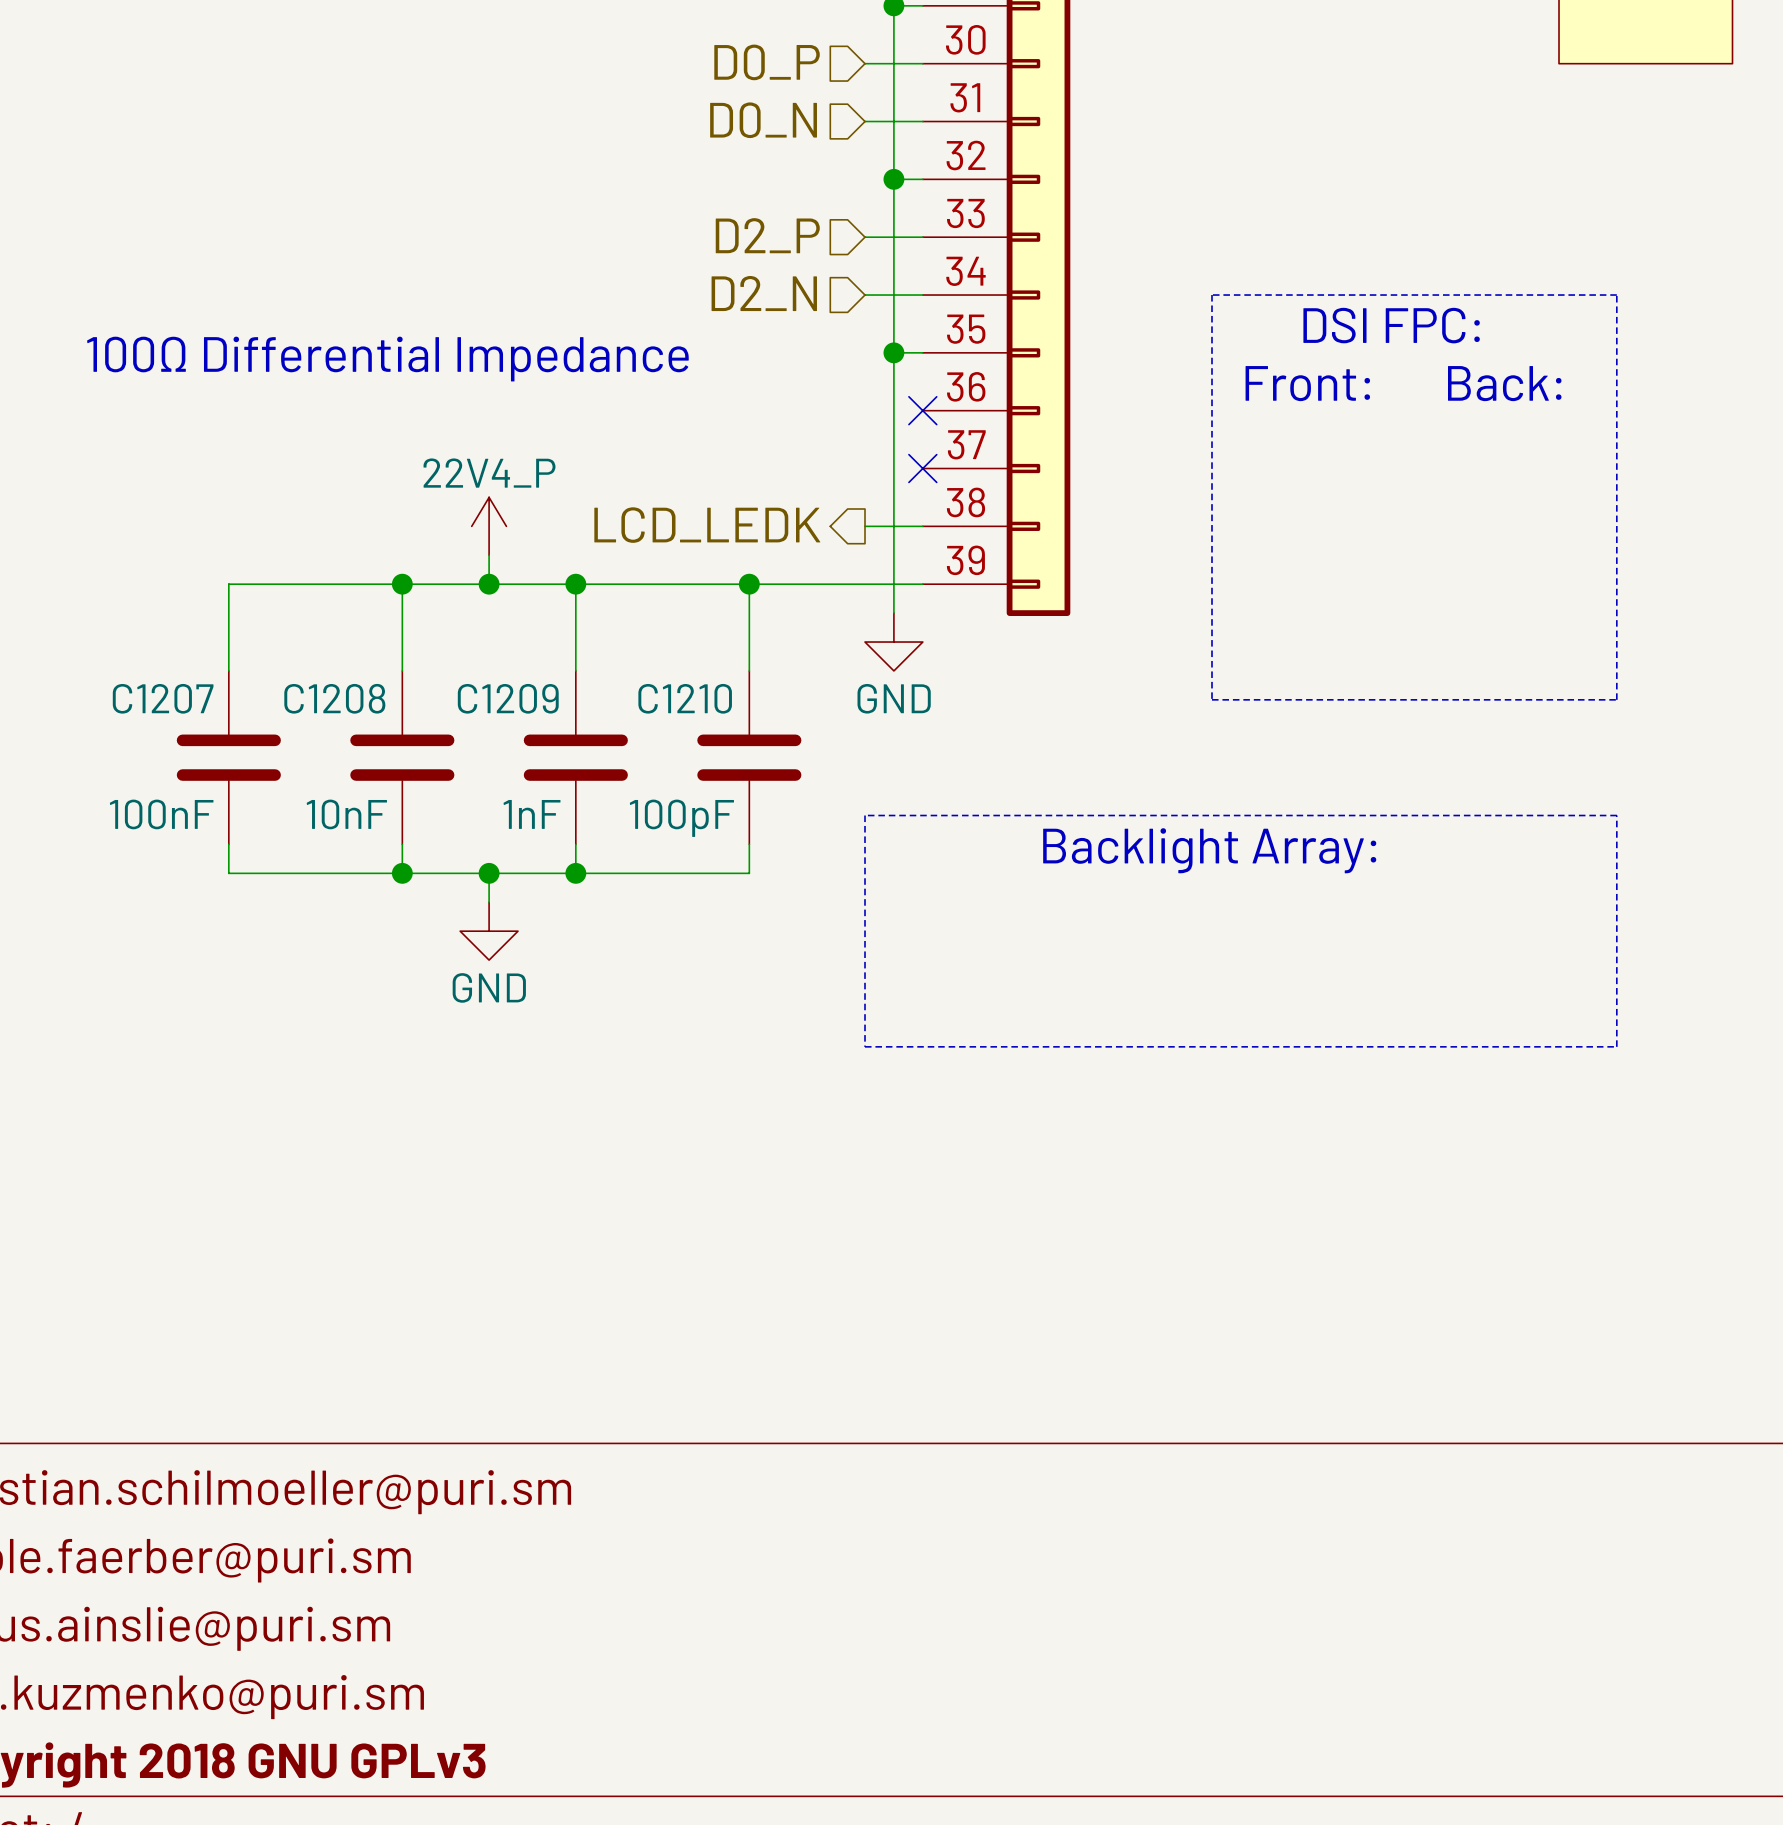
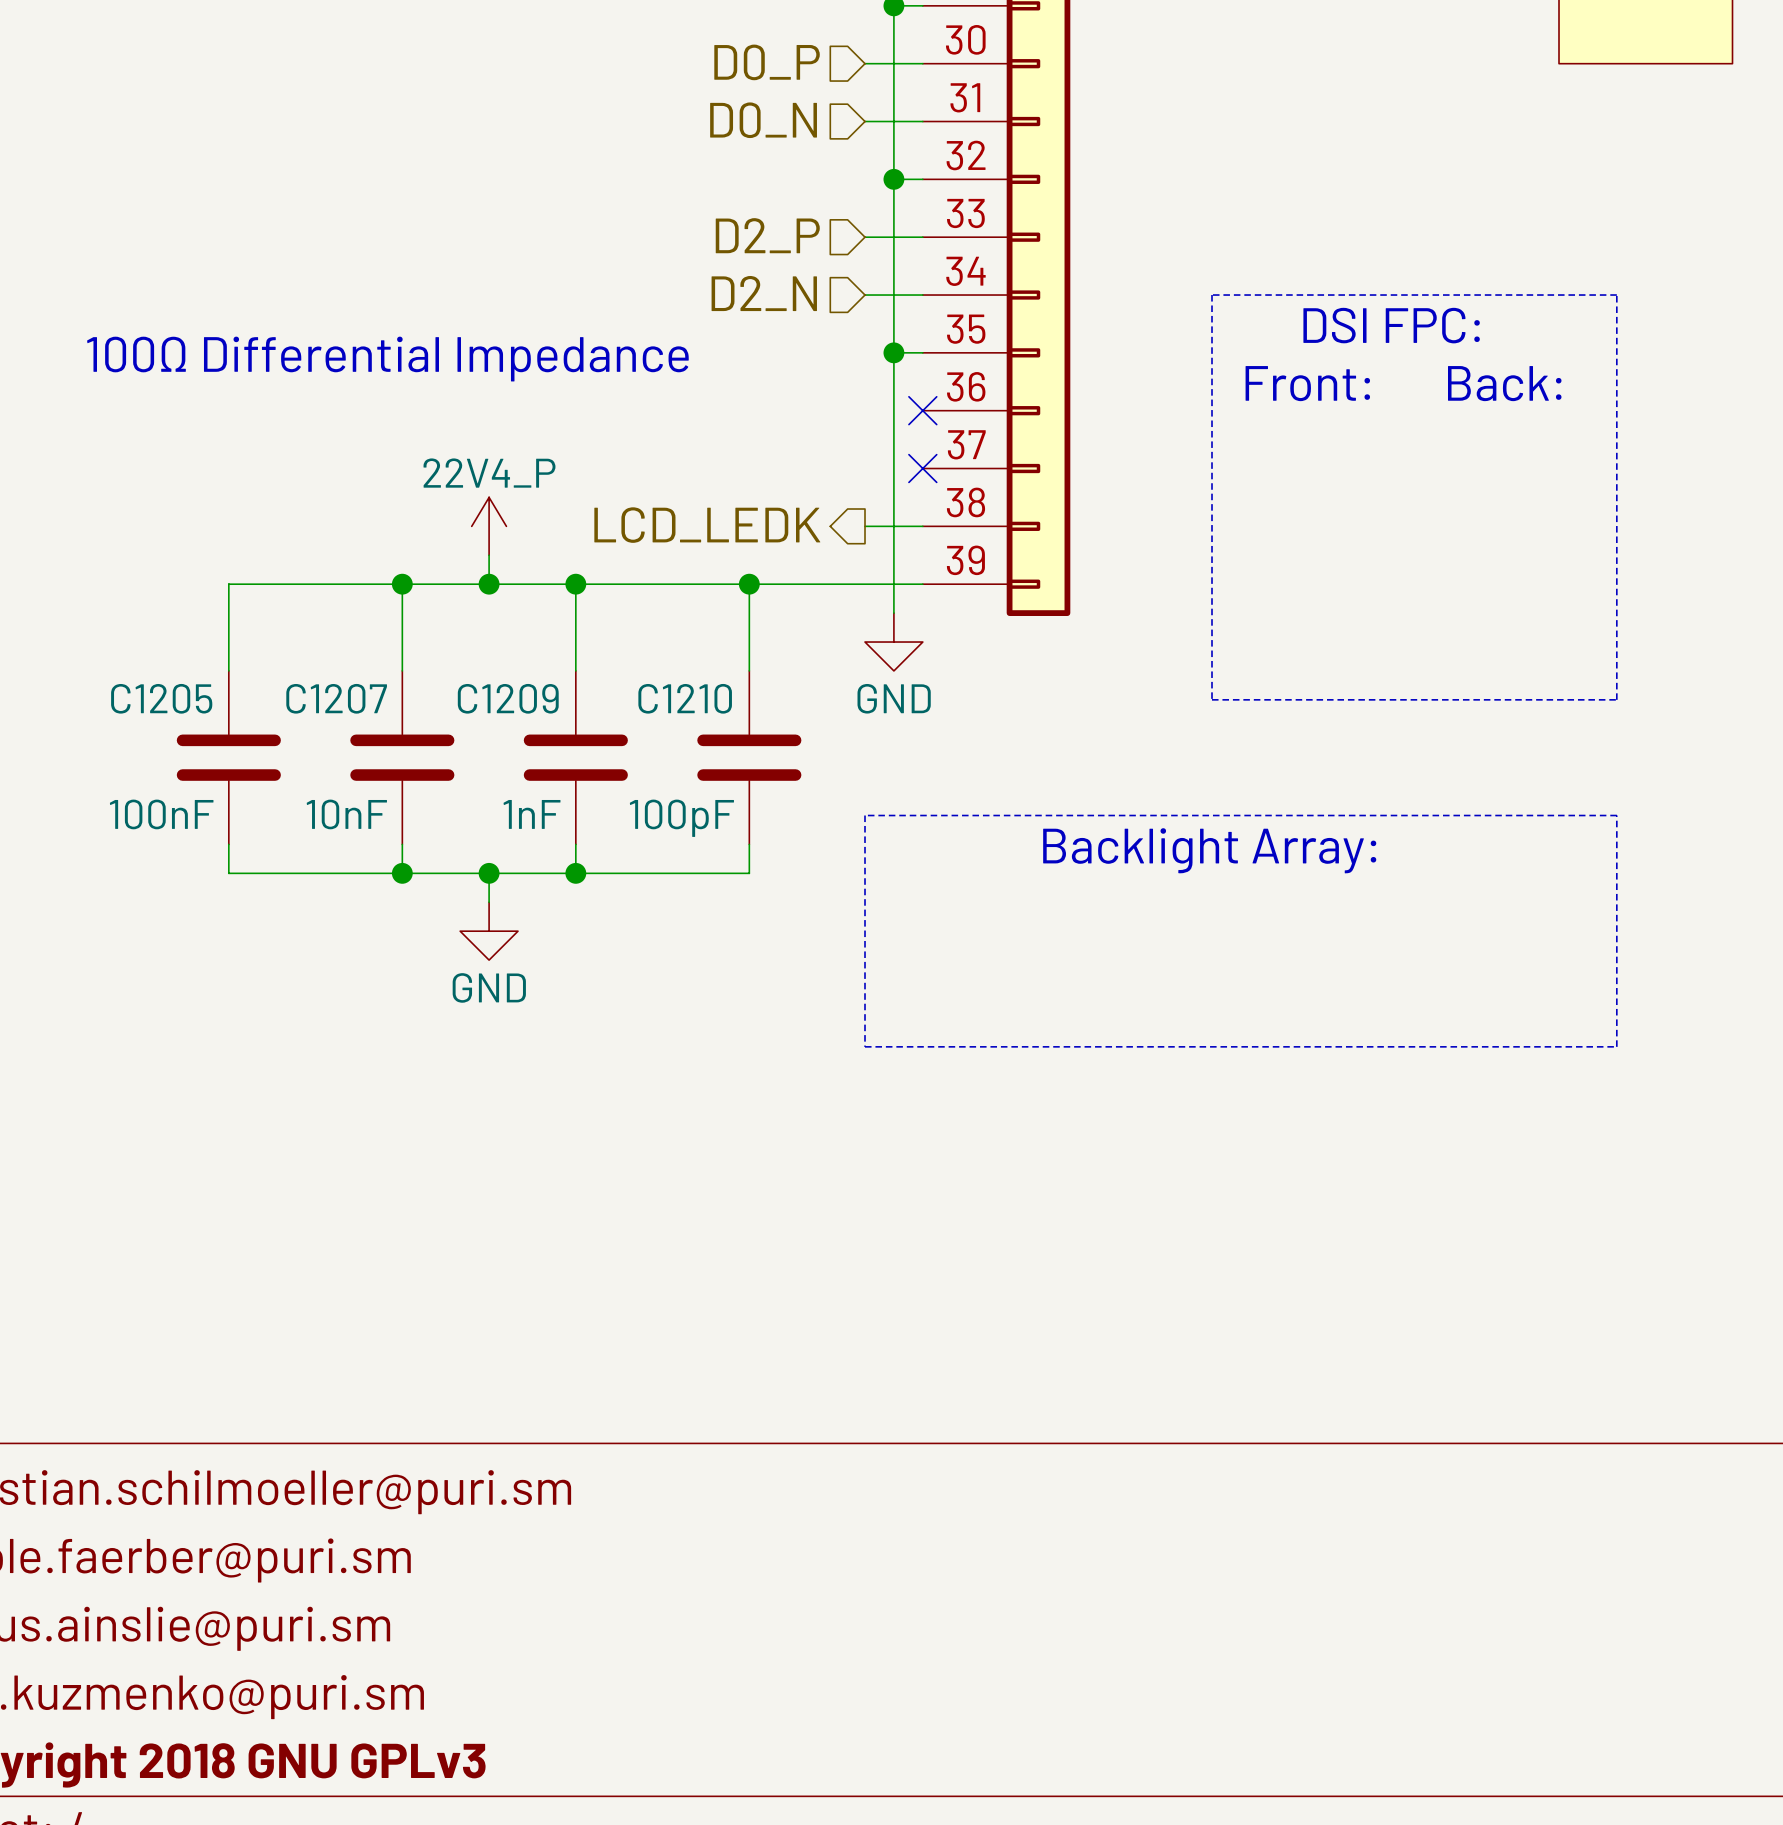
C1207 name: C1207 (163, 698) -> C1205 (161, 698)
C1208 name: C1208 (334, 698) -> C1207 (336, 698)

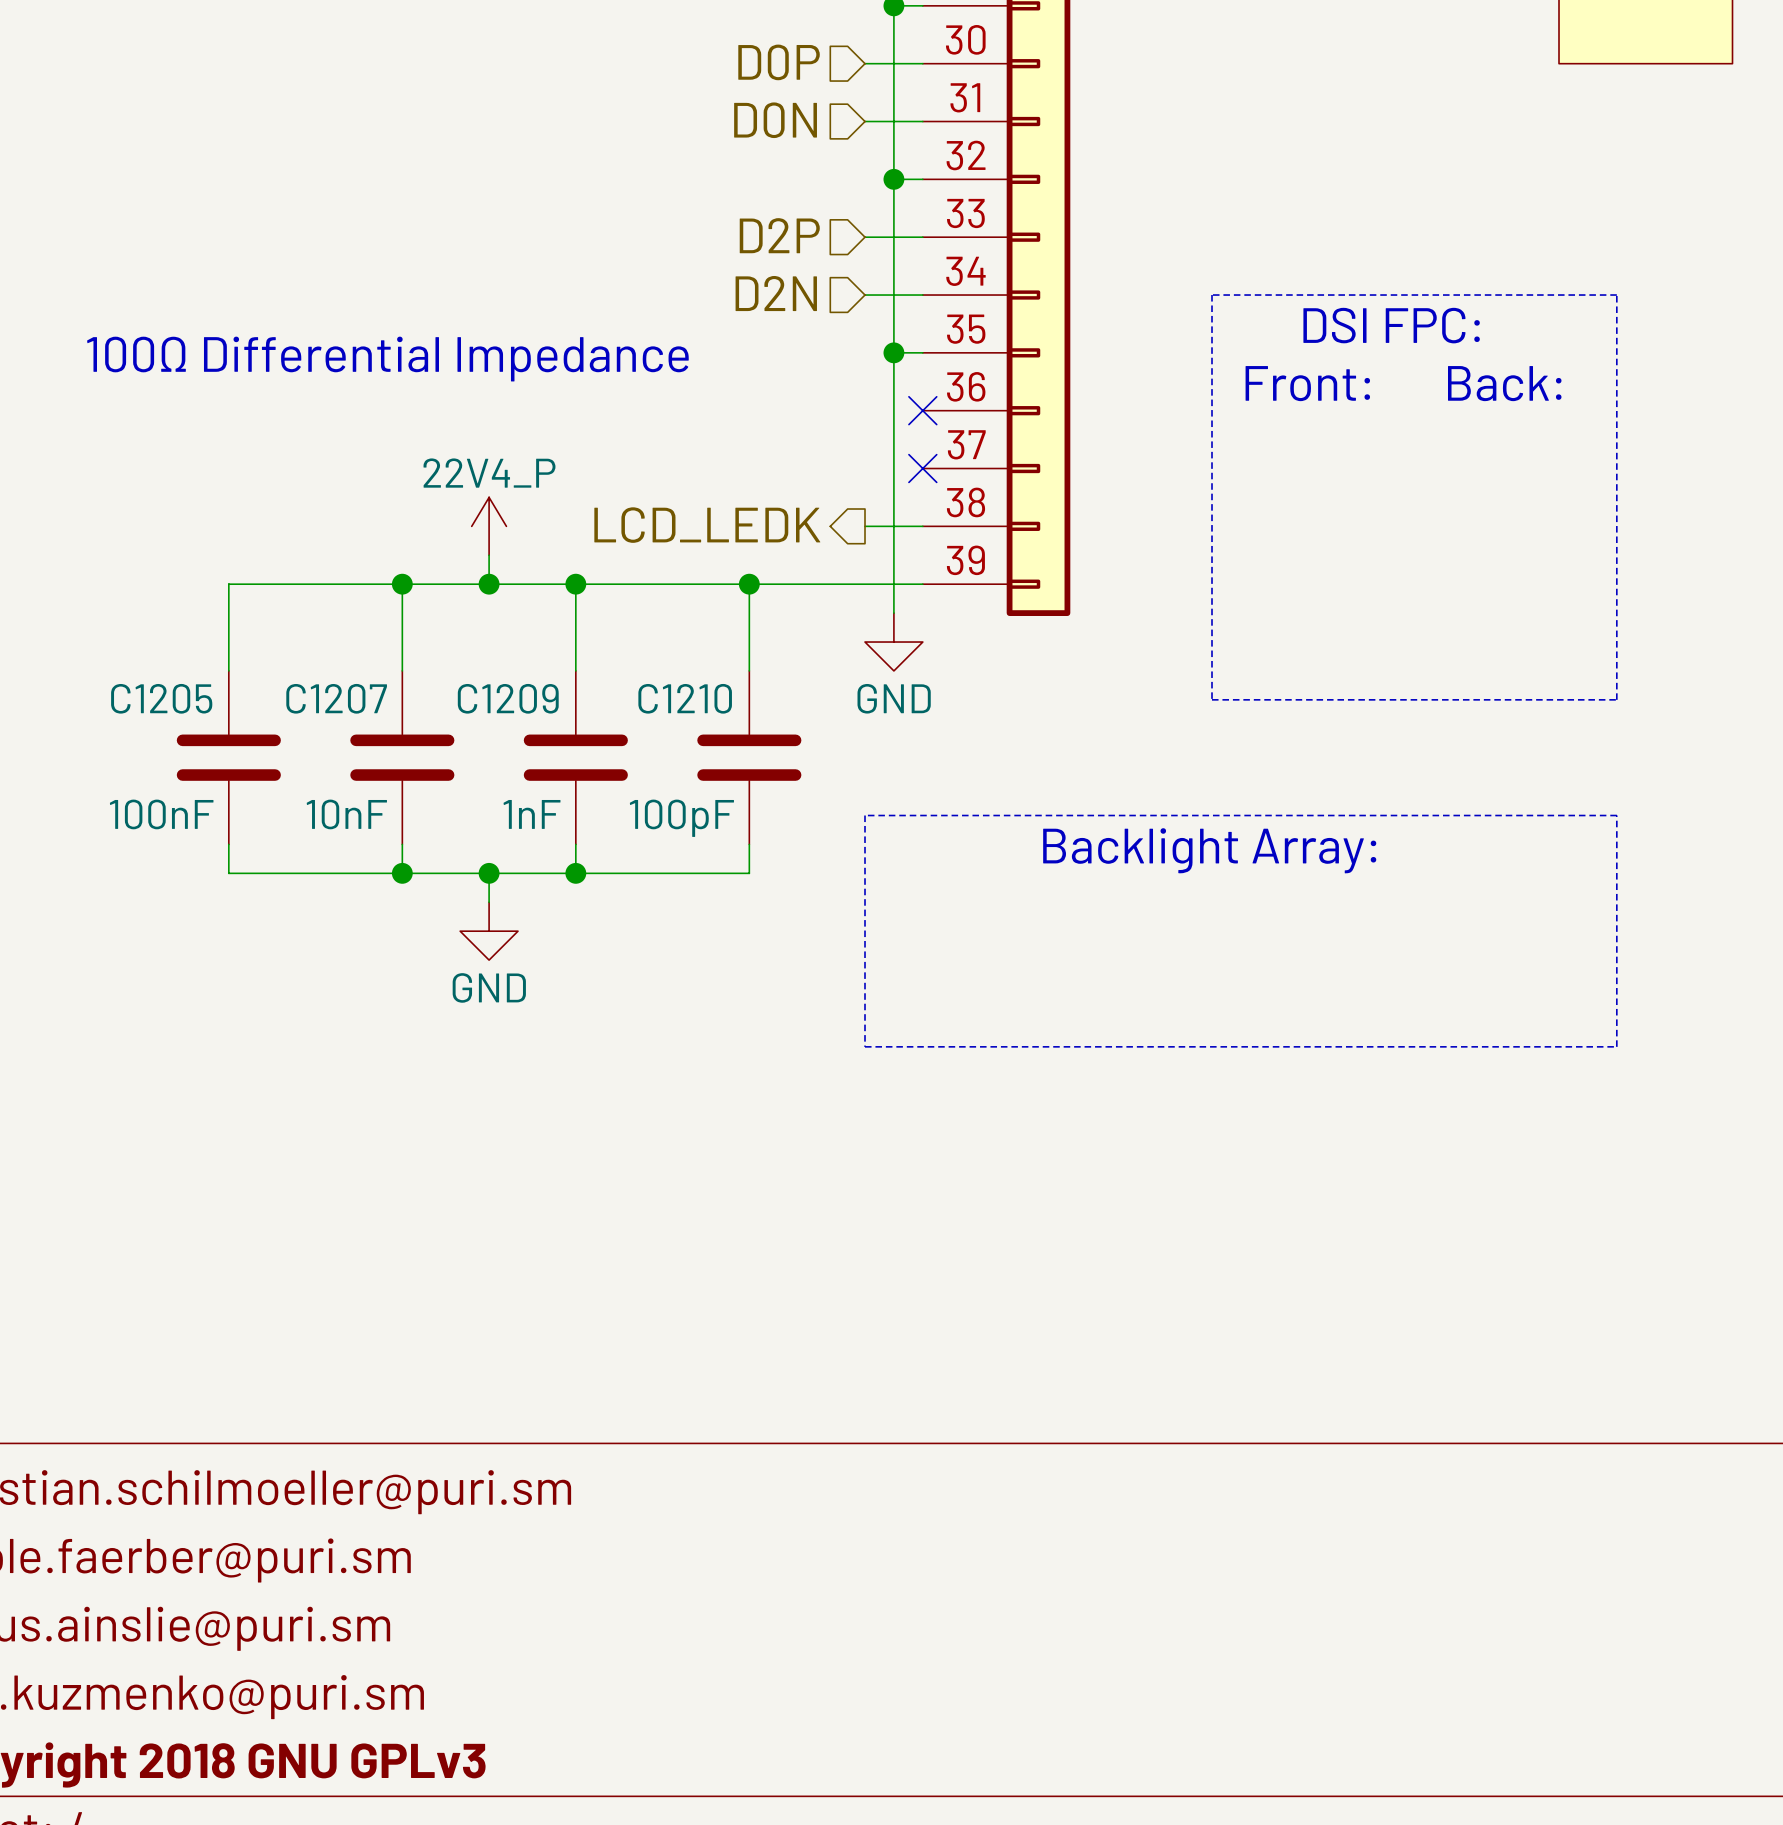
hierarchical label: D0_P (767, 62) -> D0P (779, 62)
hierarchical label: D0_N (763, 120) -> D0N (775, 120)
hierarchical label: D2_P (767, 235) -> D2P (779, 235)
hierarchical label: D2_N (764, 293) -> D2N (776, 293)

